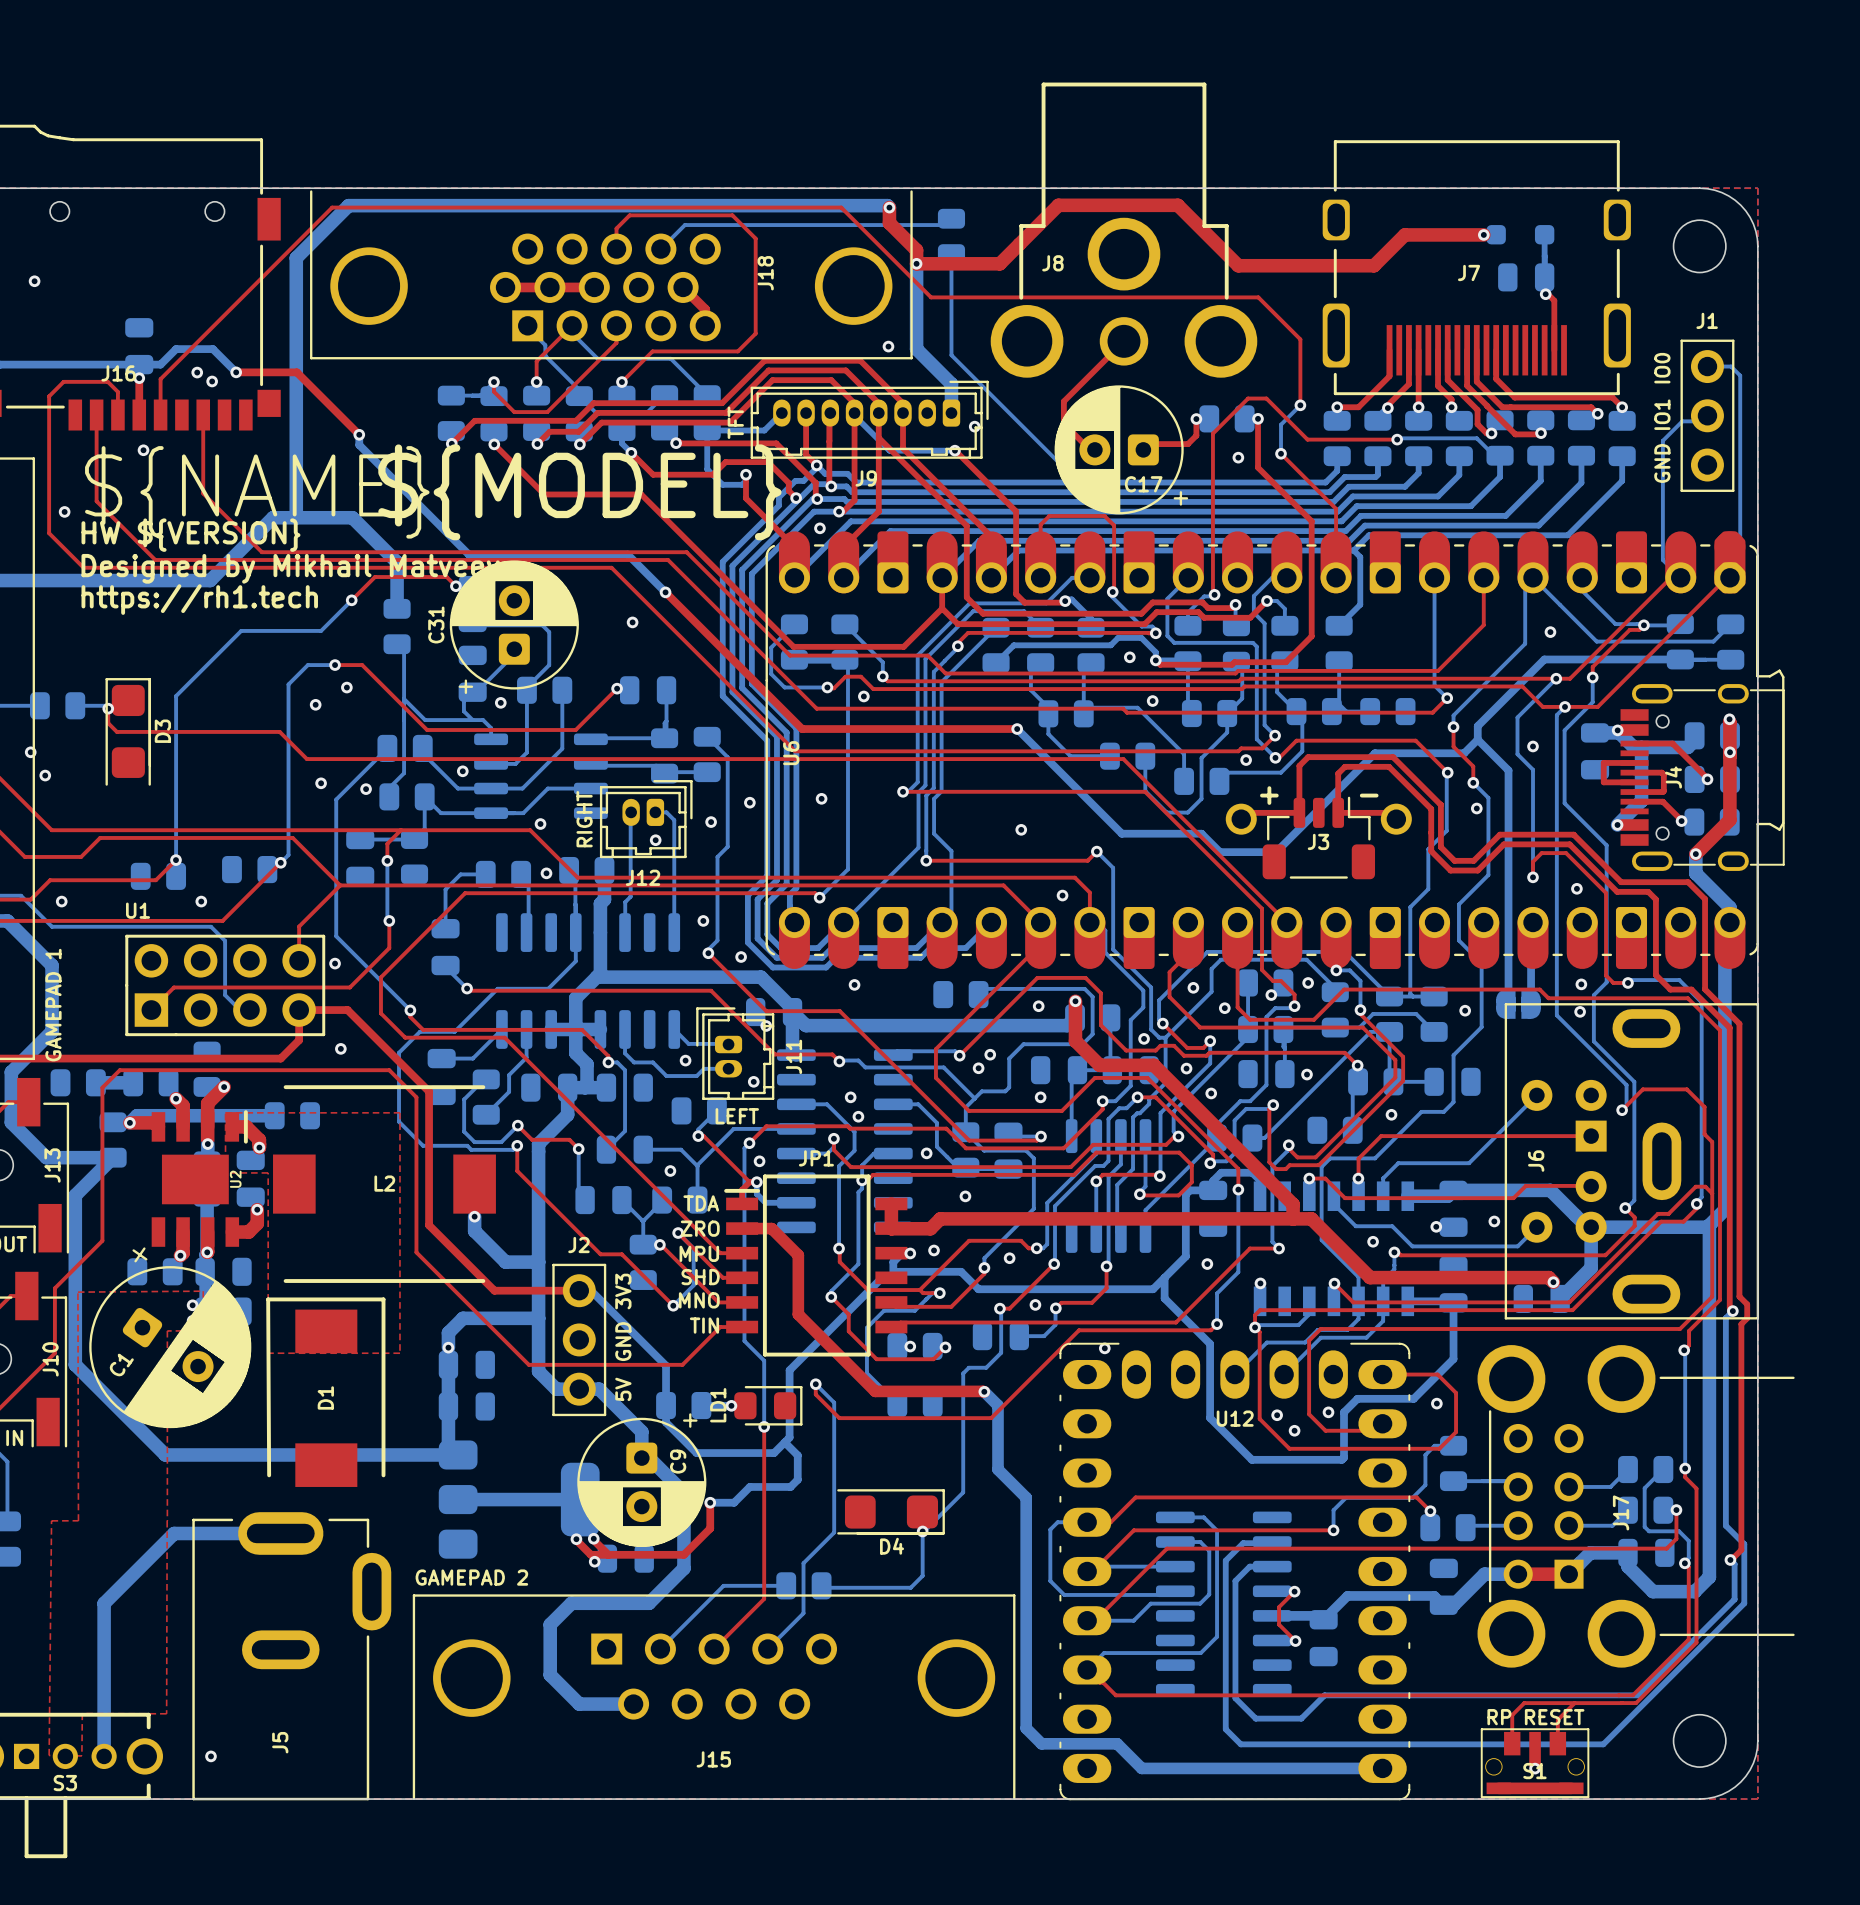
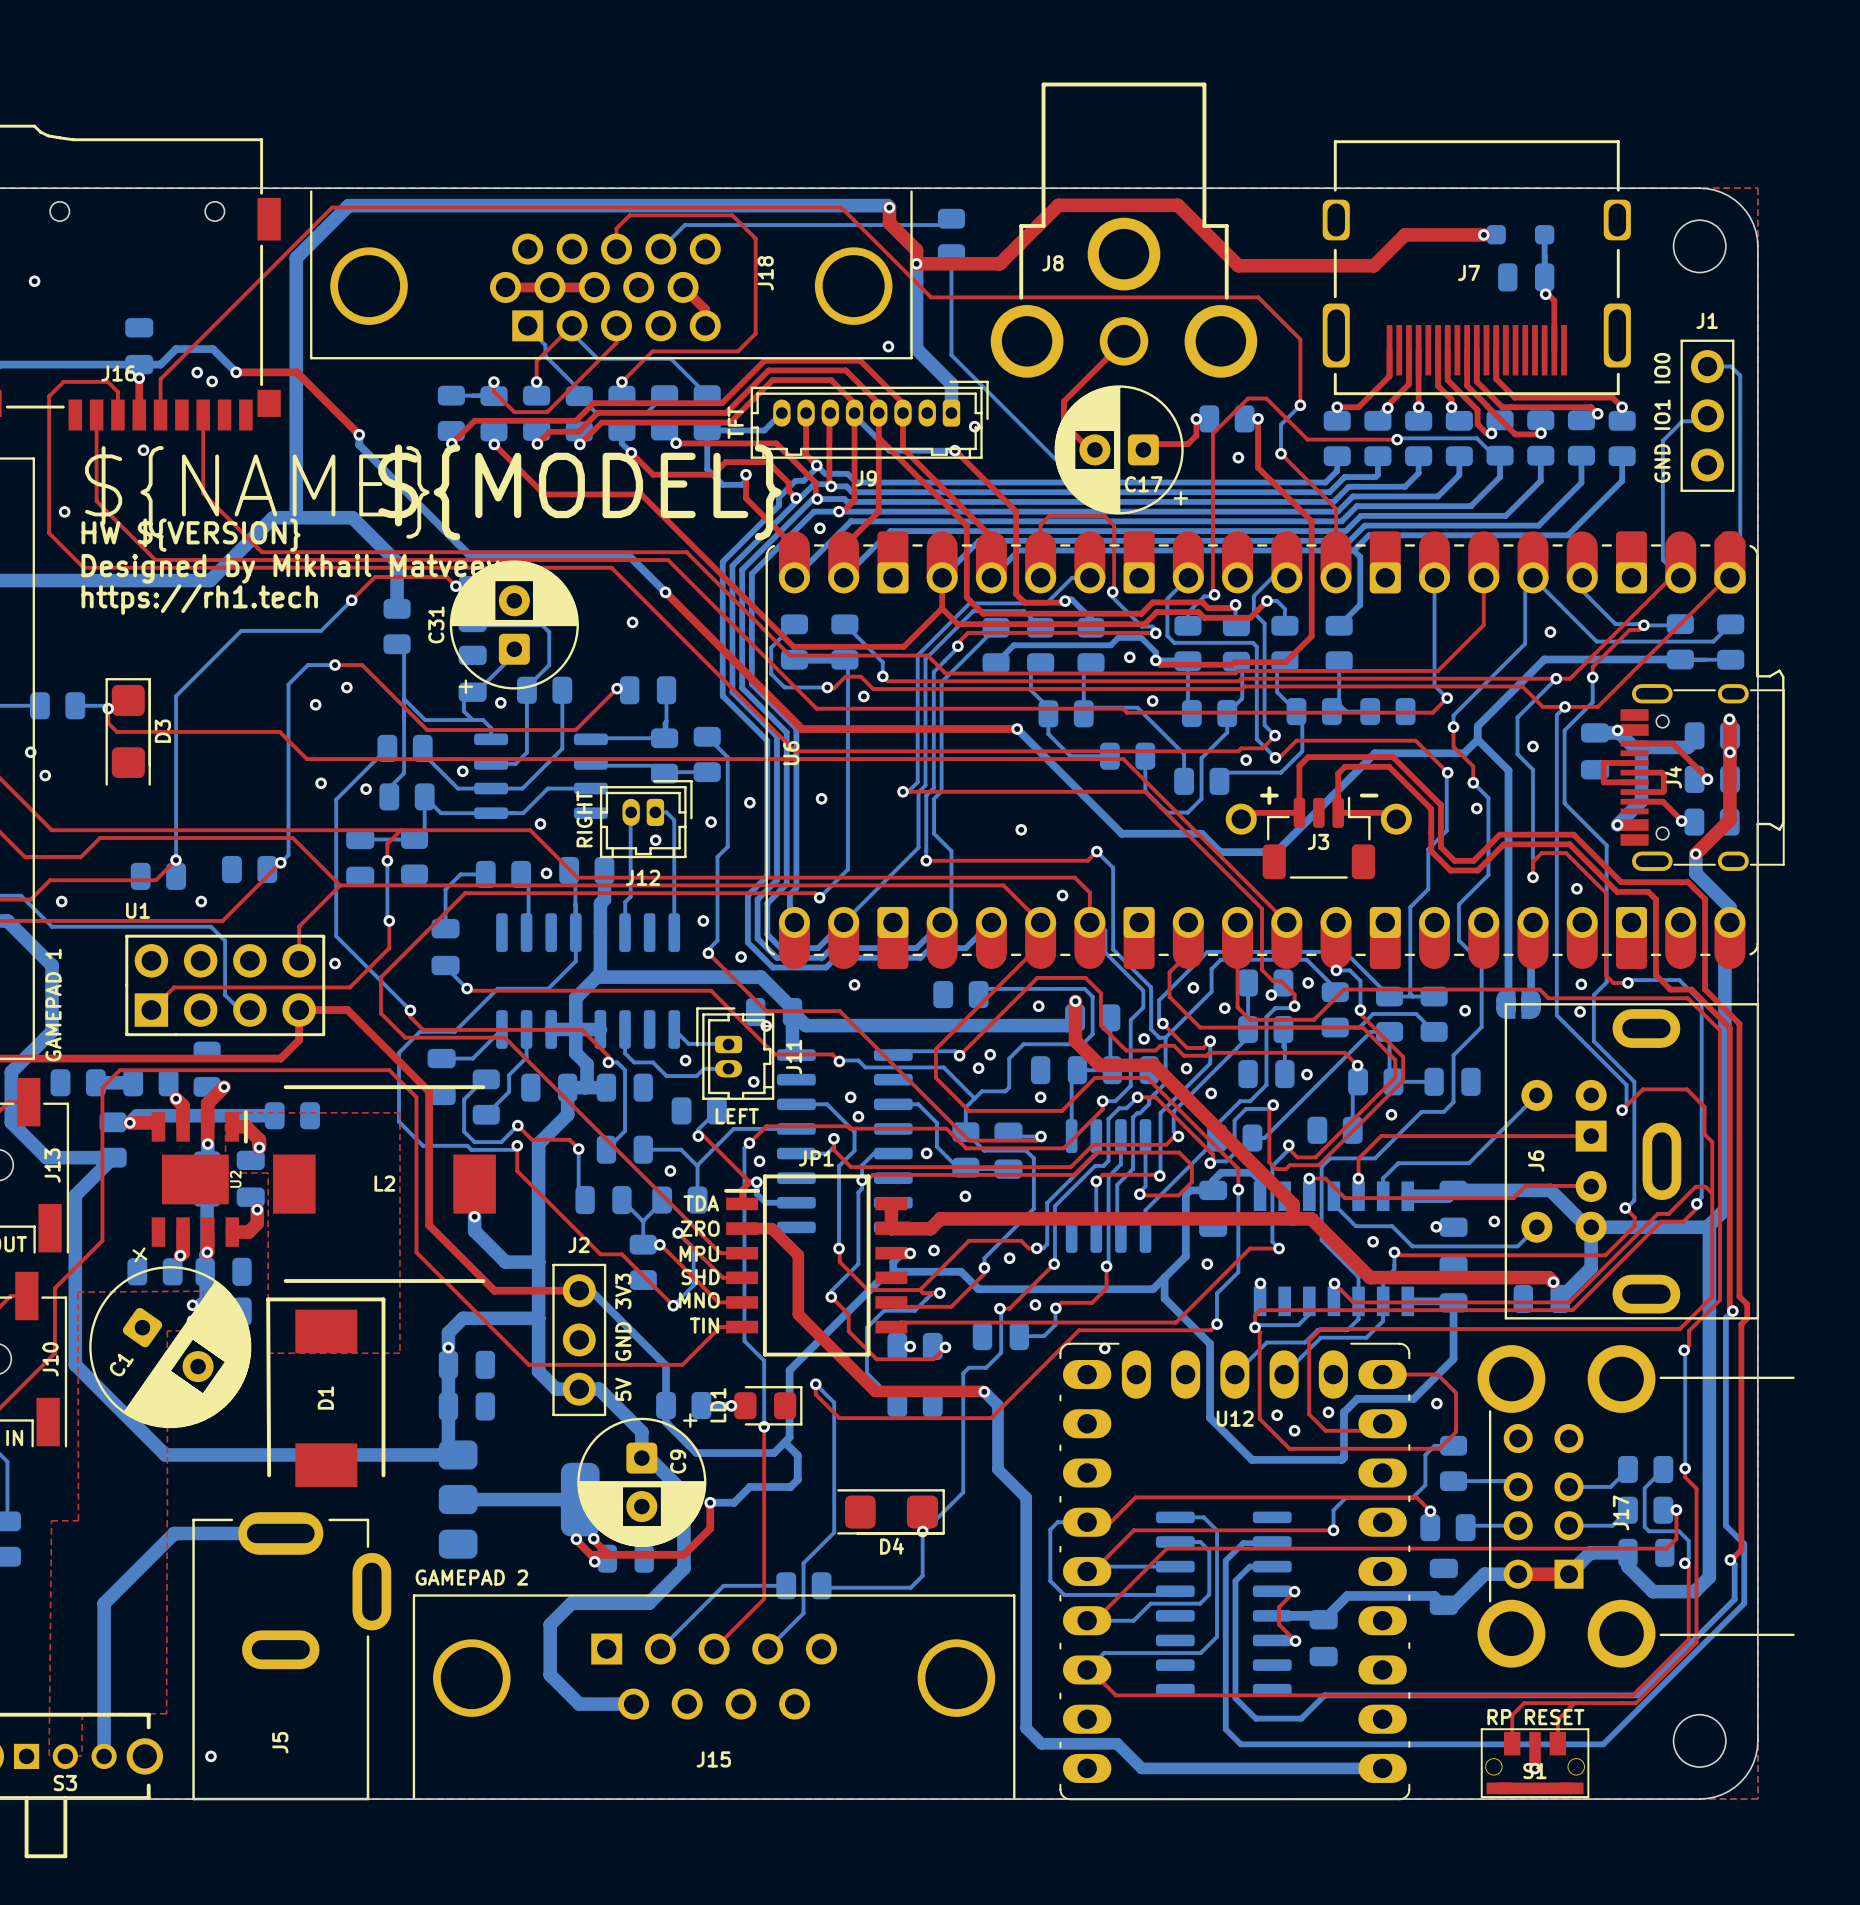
via: (340, 1048) -> none

